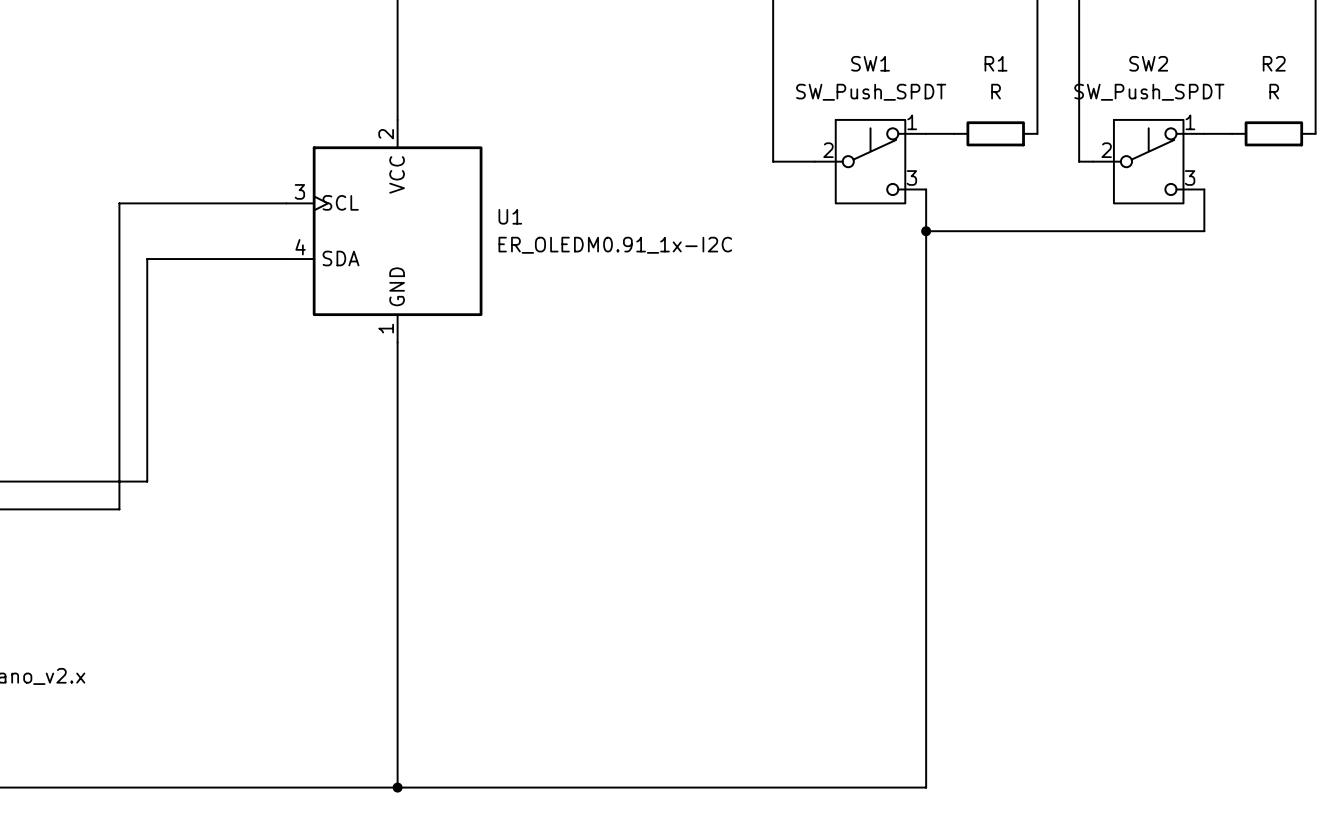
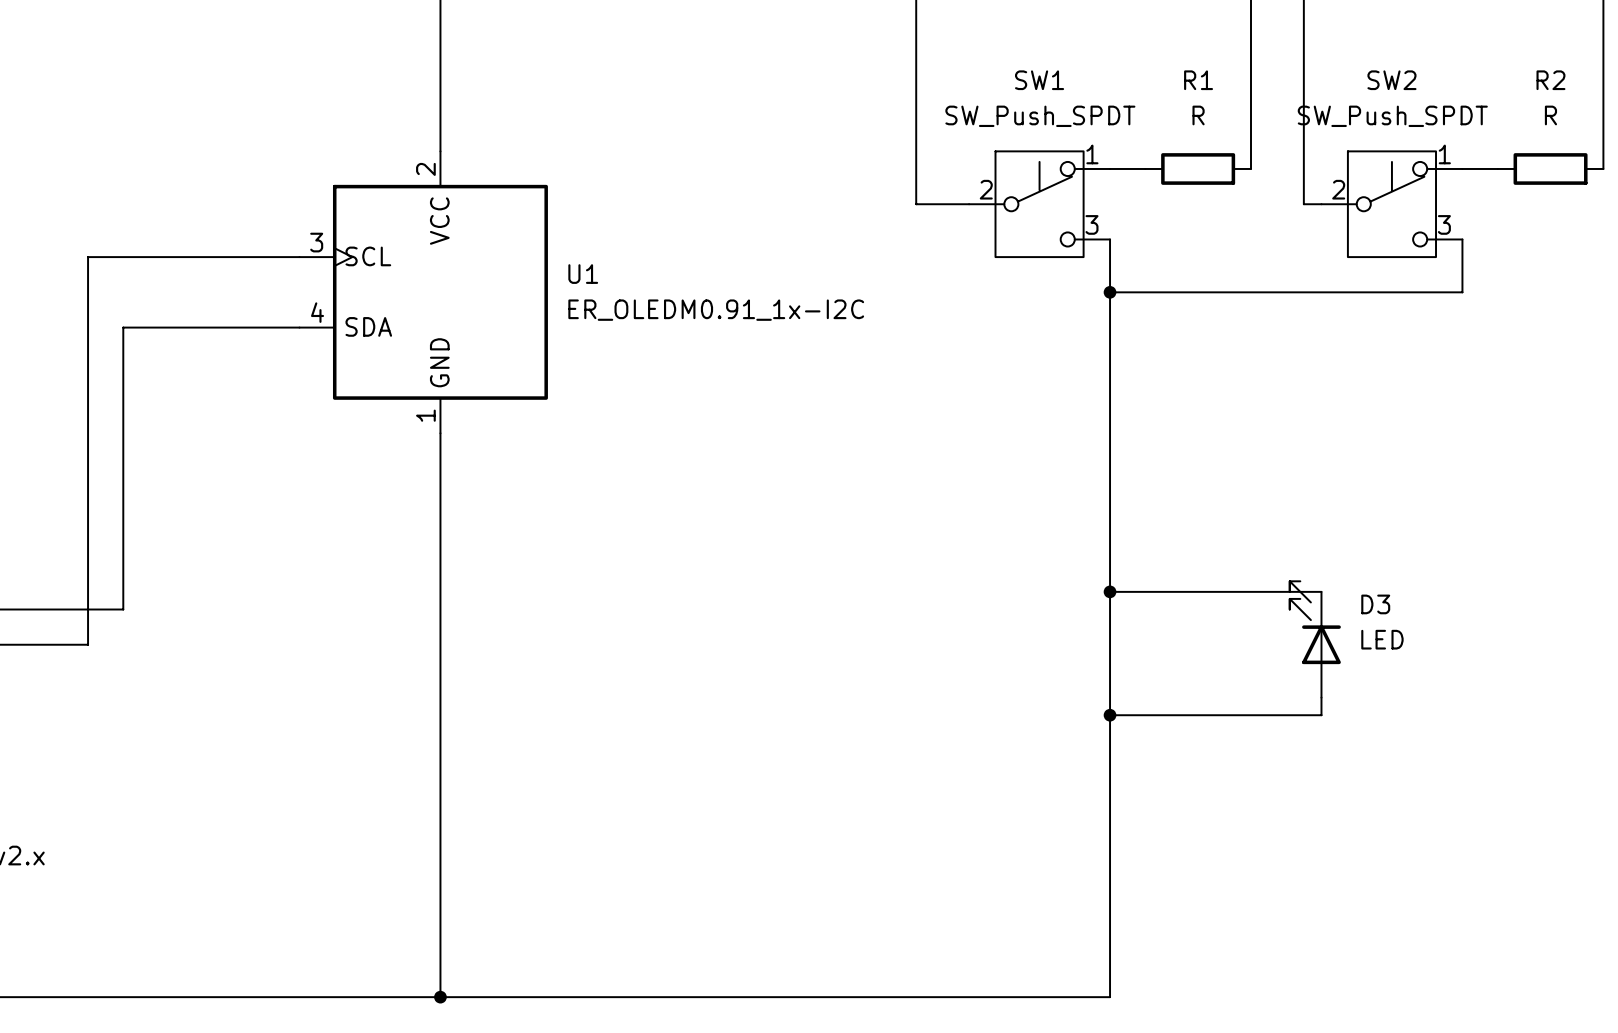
wire: none -> (1110, 591) (1321, 591)
junction: none -> (1110, 591)
D3: none -> LED (1315, 639)
wire: none -> (1321, 697) (1321, 715) (1110, 715)
junction: none -> (1110, 715)

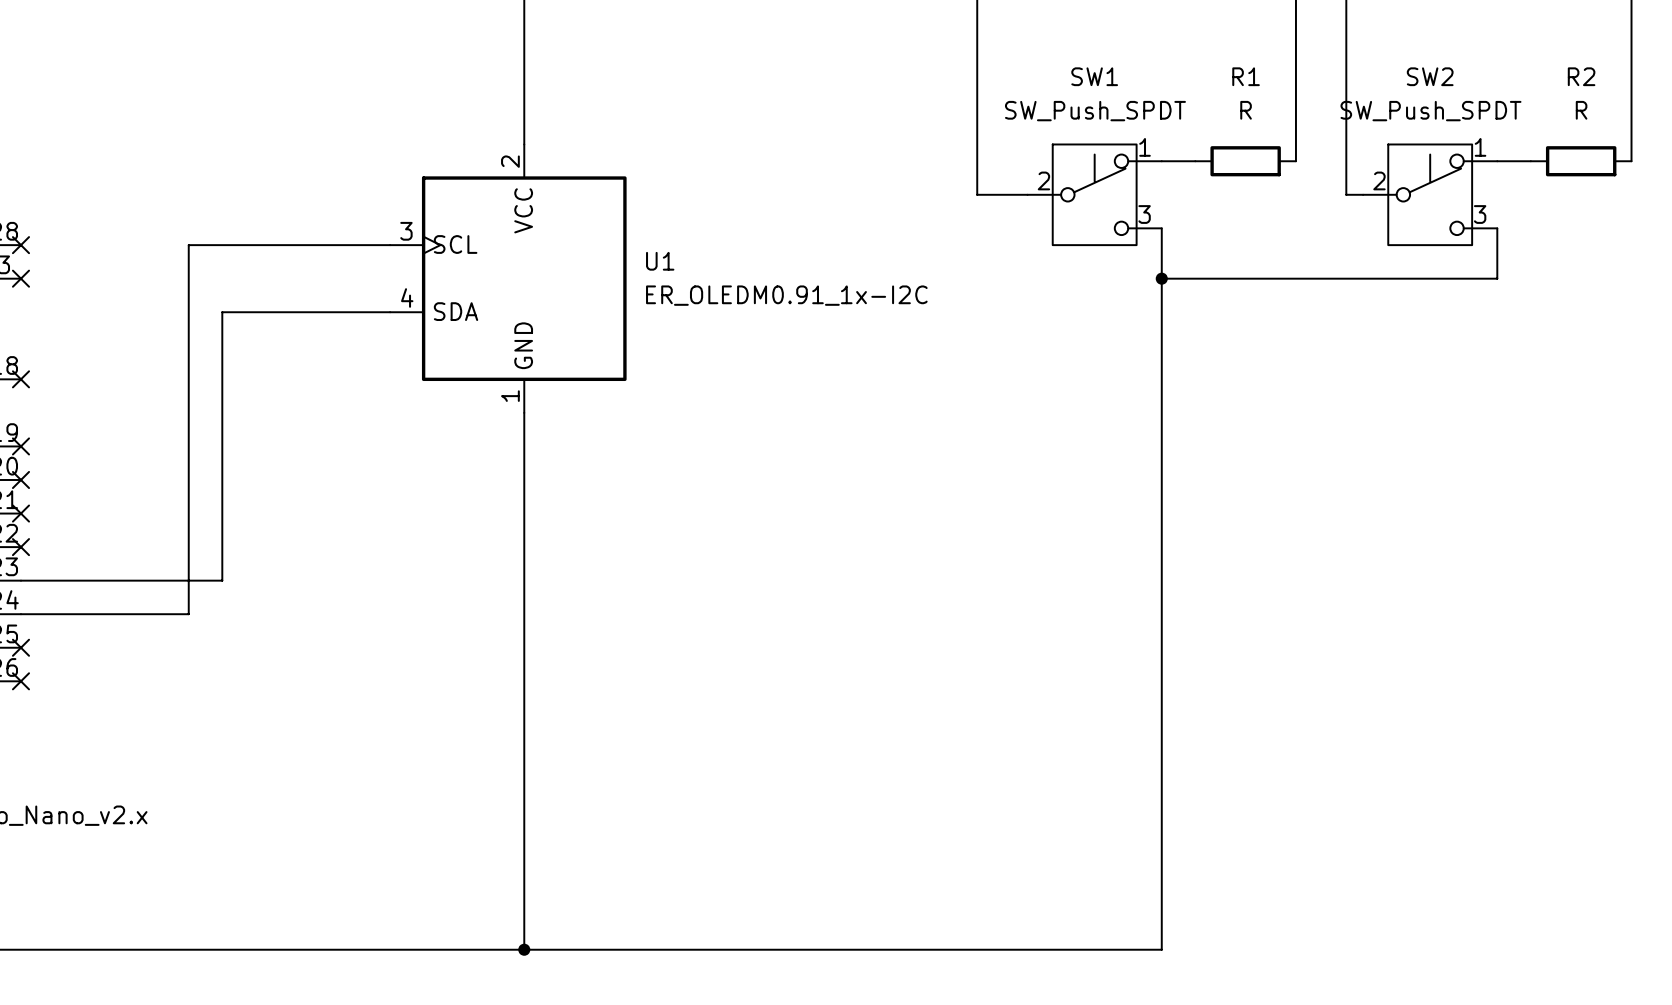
wire: (1110, 591) (1321, 591) -> none
junction: (1110, 591) -> none
D3: LED (1315, 639) -> none
wire: (1321, 697) (1321, 715) (1110, 715) -> none
junction: (1110, 715) -> none

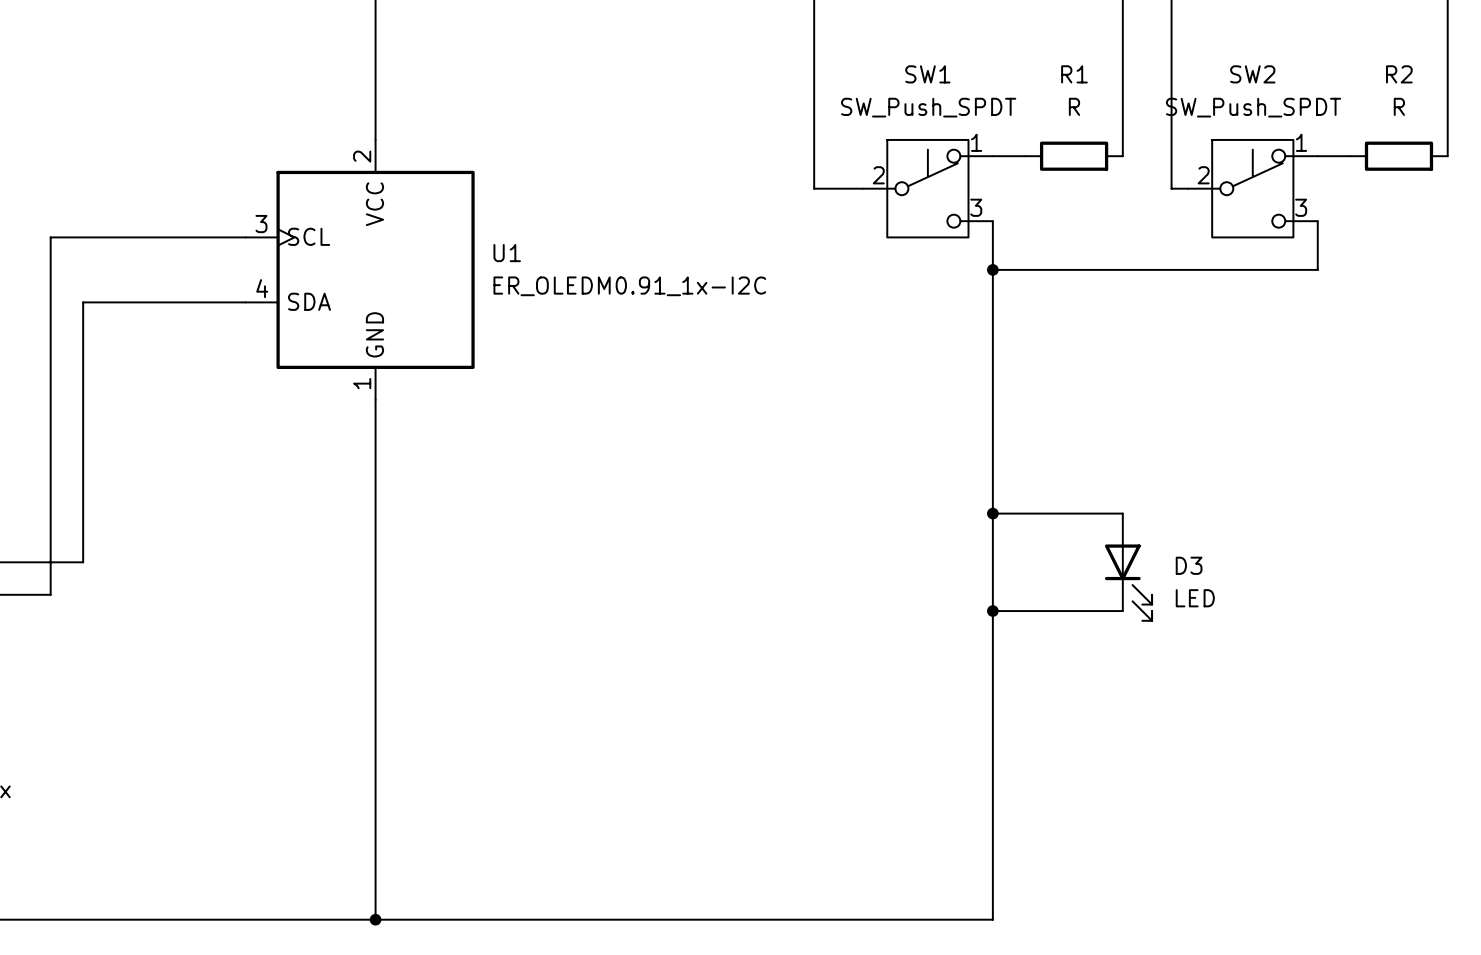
wire: none -> (992, 513) (1122, 513)
junction: none -> (992, 513)
D3: none -> LED (1128, 567)
wire: none -> (992, 611) (1122, 611)
junction: none -> (992, 611)

